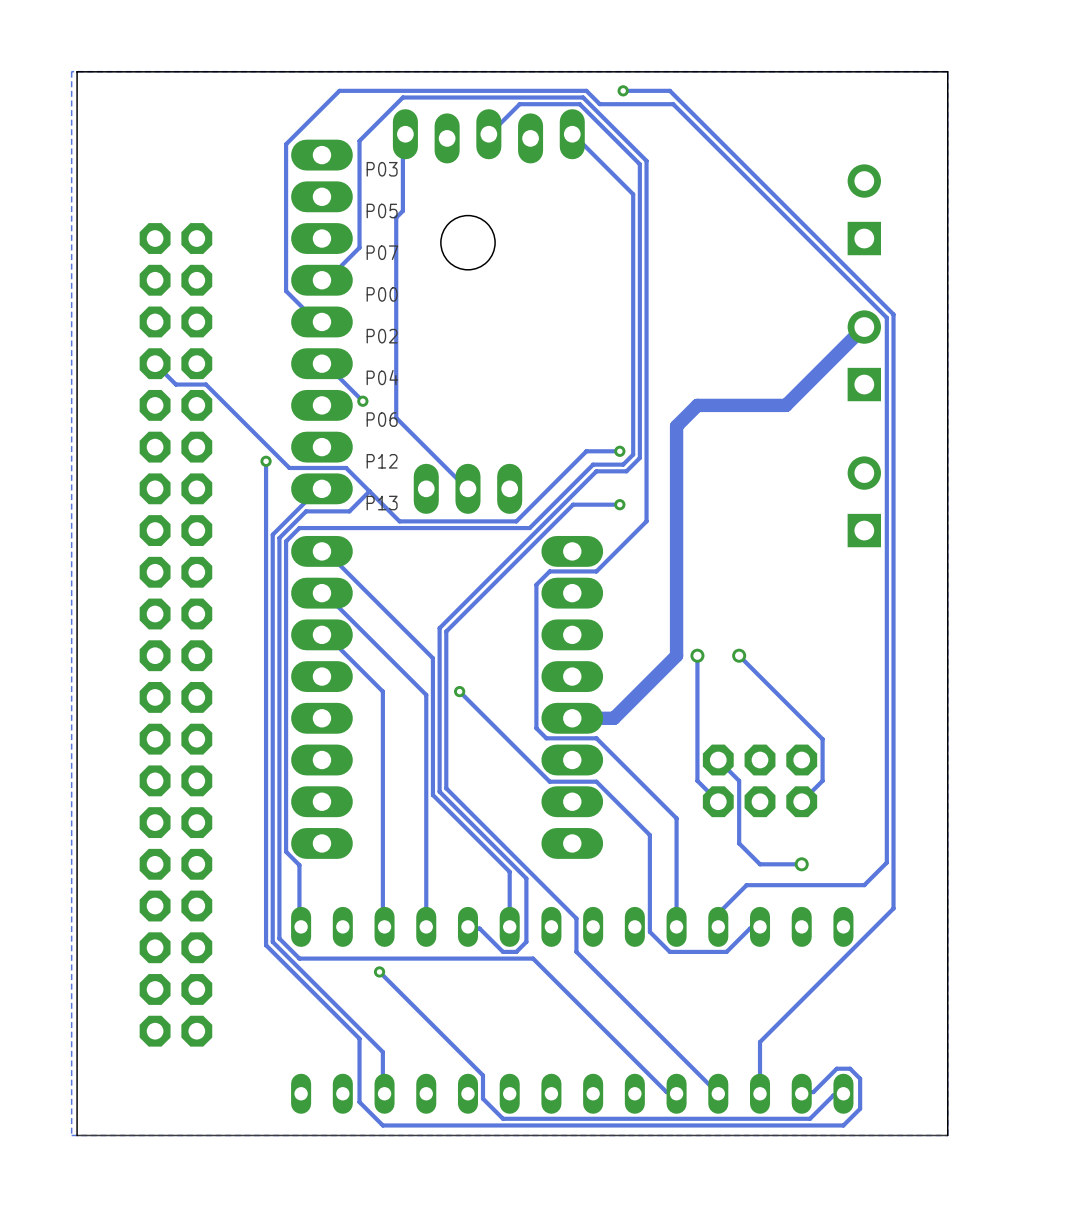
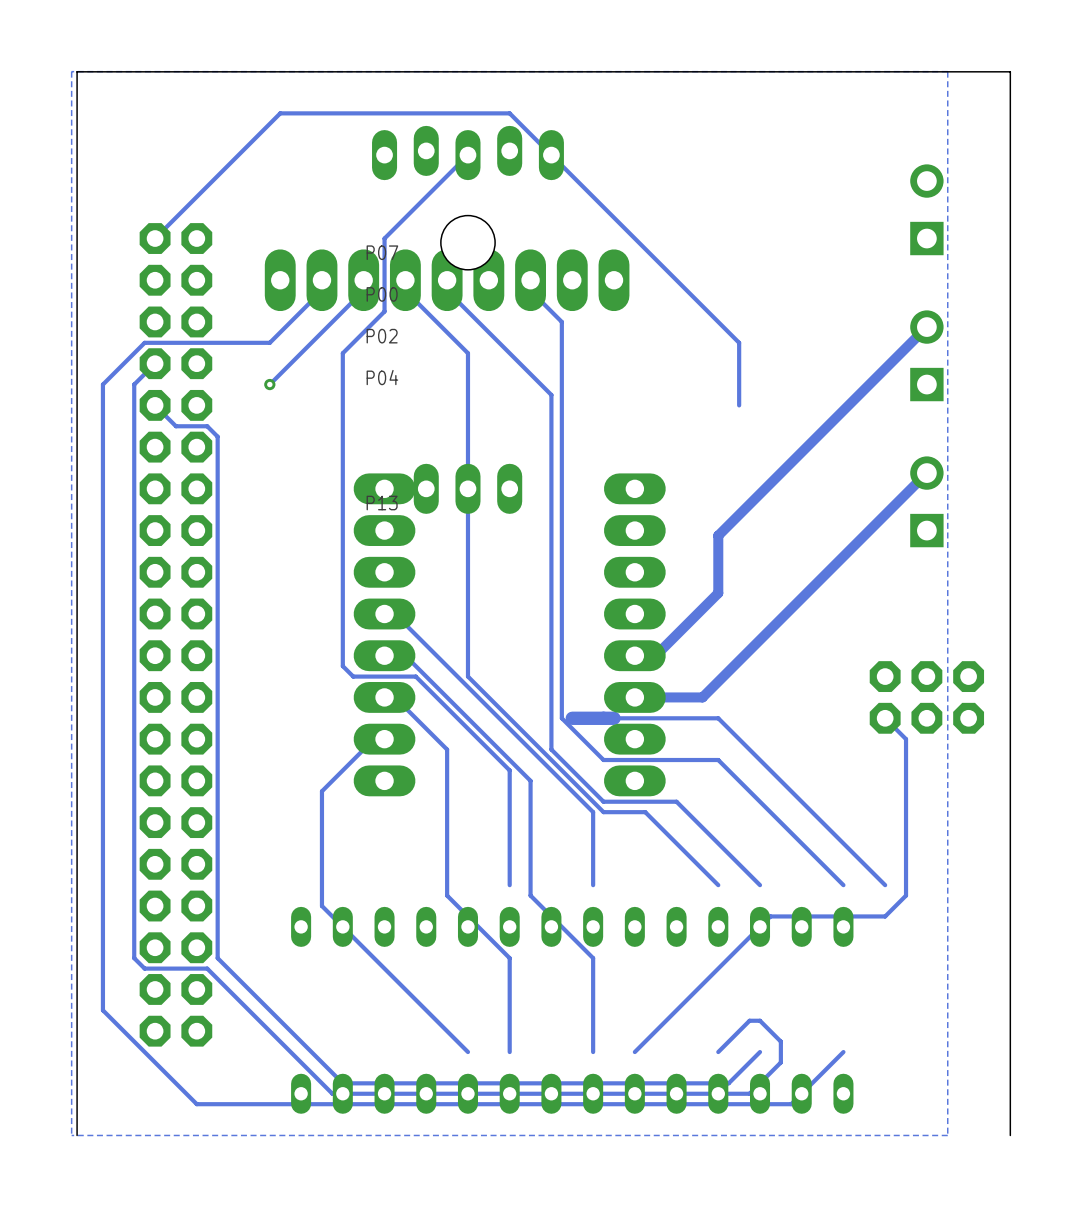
board edge: (947, 71) (947, 1135) -> (947, 71) (1010, 71) (1010, 1135)
track: (623, 90) (669, 90) (893, 314) (893, 908) (760, 1042) (760, 1093) -> none
via: (623, 90) -> none
track: (405, 134) (402, 134) (402, 210) (396, 217) (396, 417) (467, 488) -> none
track: (488, 134) (519, 104) (579, 104) (639, 164) (639, 457) (626, 471) (596, 471) (439, 628) (439, 791) (526, 878) (526, 941) (516, 951) (503, 951) (479, 928) (467, 926) -> none
track: (572, 134) (633, 194) (633, 454) (623, 464) (593, 464) (529, 528) (299, 528) (286, 541) (286, 851) (299, 865) (299, 925) (301, 926) -> none
part rotation: 0° (488, 136) -> 180° (467, 153)
text: P03 (382, 169) -> none
part position: (864, 209) -> (926, 209)
text: P05 (382, 210) -> none
track: none -> (155, 238) (280, 113) (509, 113) (739, 342) (739, 405)
track: (321, 280) (322, 277) (329, 277) (359, 247) (359, 140) (402, 97) (583, 97) (646, 160) (646, 521) (596, 571) (549, 571) (536, 584) (536, 728) (546, 738) (596, 738) (676, 818) (676, 926) -> (321, 280) (321, 290) (269, 342) (144, 342) (102, 384) (102, 1010) (196, 1104) (791, 1104) (801, 1093)
track: none -> (363, 280) (363, 290) (269, 384)
track: none -> (405, 280) (405, 290) (467, 353) (467, 676) (603, 812) (645, 812) (718, 885)
track: none -> (447, 280) (447, 290) (551, 394) (551, 749) (603, 801) (676, 801) (760, 885)
track: none -> (530, 280) (530, 290) (561, 321) (561, 718) (603, 760) (718, 760)
track: (321, 321) (319, 324) (286, 291) (286, 144) (339, 90) (586, 90) (599, 104) (673, 104) (886, 317) (886, 862) (864, 885) (746, 885) (719, 911) (718, 926) -> none
part rotation: 0° (321, 321) -> 90° clockwise (447, 280)
track: (864, 327) (785, 405) (697, 405) (676, 426) (676, 655) (613, 718) -> (885, 885) (718, 718) (613, 718)
track: none -> (926, 327) (718, 535) (718, 593) (655, 655) (634, 655)
part position: (864, 355) -> (926, 355)
track: (155, 363) (175, 384) (205, 384) (289, 467) (346, 467) (399, 521) (516, 521) (586, 451) (619, 451) -> (155, 363) (134, 384) (134, 958) (144, 968) (207, 968) (332, 1093) (749, 1093) (780, 1062) (780, 1041) (760, 1020) (749, 1020) (718, 1052)
track: (321, 363) (322, 361) (362, 401) -> none
via: none -> (269, 384)
via: (362, 401) -> none
track: none -> (155, 405) (175, 426) (207, 426) (217, 436) (217, 958) (342, 1083) (728, 1083) (760, 1052)
text: P06 (382, 419) -> none
via: (619, 451) -> none
track: (266, 461) (266, 945) (359, 1038) (359, 1102) (382, 1125) (843, 1125) (860, 1108) (860, 1078) (850, 1068) (836, 1068) (813, 1092) (803, 1092) -> (843, 1052) (803, 1092)
via: (266, 461) -> none
text: P12 (382, 461) -> none
track: none -> (926, 473) (702, 697) (634, 697)
track: (321, 488) (319, 488) (272, 534) (272, 941) (382, 1052) (382, 1092) (384, 1093) -> none
track: (369, 491) (349, 511) (306, 511) (279, 538) (279, 938) (299, 958) (533, 958) (666, 1092) (676, 1092) (676, 1093) -> none
part position: (864, 501) -> (926, 501)
track: (619, 504) (573, 504) (446, 631) (446, 788) (576, 918) (576, 951) (718, 1093) -> none
via: (619, 504) -> none
track: (321, 551) (326, 551) (432, 658) (432, 795) (509, 871) -> (467, 155) (384, 238) (384, 311) (342, 353) (342, 666) (353, 676) (415, 676) (509, 770) (509, 871)
track: (321, 593) (322, 591) (426, 694) (426, 926) -> none
track: none -> (384, 613) (394, 613) (593, 812) (593, 885)
track: (321, 634) (326, 634) (382, 691) (382, 925) (384, 926) -> none
track: none -> (384, 655) (405, 655) (530, 780) (530, 895) (593, 958) (593, 1052)
track: (697, 655) (697, 780) (718, 801) -> none
via: (697, 655) -> none
track: (739, 655) (822, 739) (822, 780) (801, 801) -> none
via: (739, 655) -> none
track: (459, 691) (549, 781) (596, 781) (649, 835) (649, 931) (669, 951) (726, 951) (750, 928) (760, 928) (760, 926) -> none
via: (459, 691) -> none
part position: (321, 697) -> (384, 634)
track: none -> (384, 697) (394, 697) (447, 749) (447, 895) (509, 958) (509, 1052)
part position: (572, 697) -> (634, 634)
track: none -> (885, 718) (906, 739) (906, 895) (885, 916) (770, 916) (634, 1052)
track: none -> (384, 739) (374, 739) (321, 791) (321, 906) (467, 1052)
track: (739, 780) (739, 843) (760, 864) (801, 864) -> (739, 780) (843, 885)
part position: (760, 780) -> (926, 697)
via: (801, 864) -> none
track: (509, 885) (509, 926) -> none
track: (379, 971) (483, 1075) (483, 1098) (503, 1118) (810, 1118) (833, 1095) (843, 1095) (843, 1093) -> none
via: (379, 971) -> none
line: (947, 1135) (77, 1135) -> none

